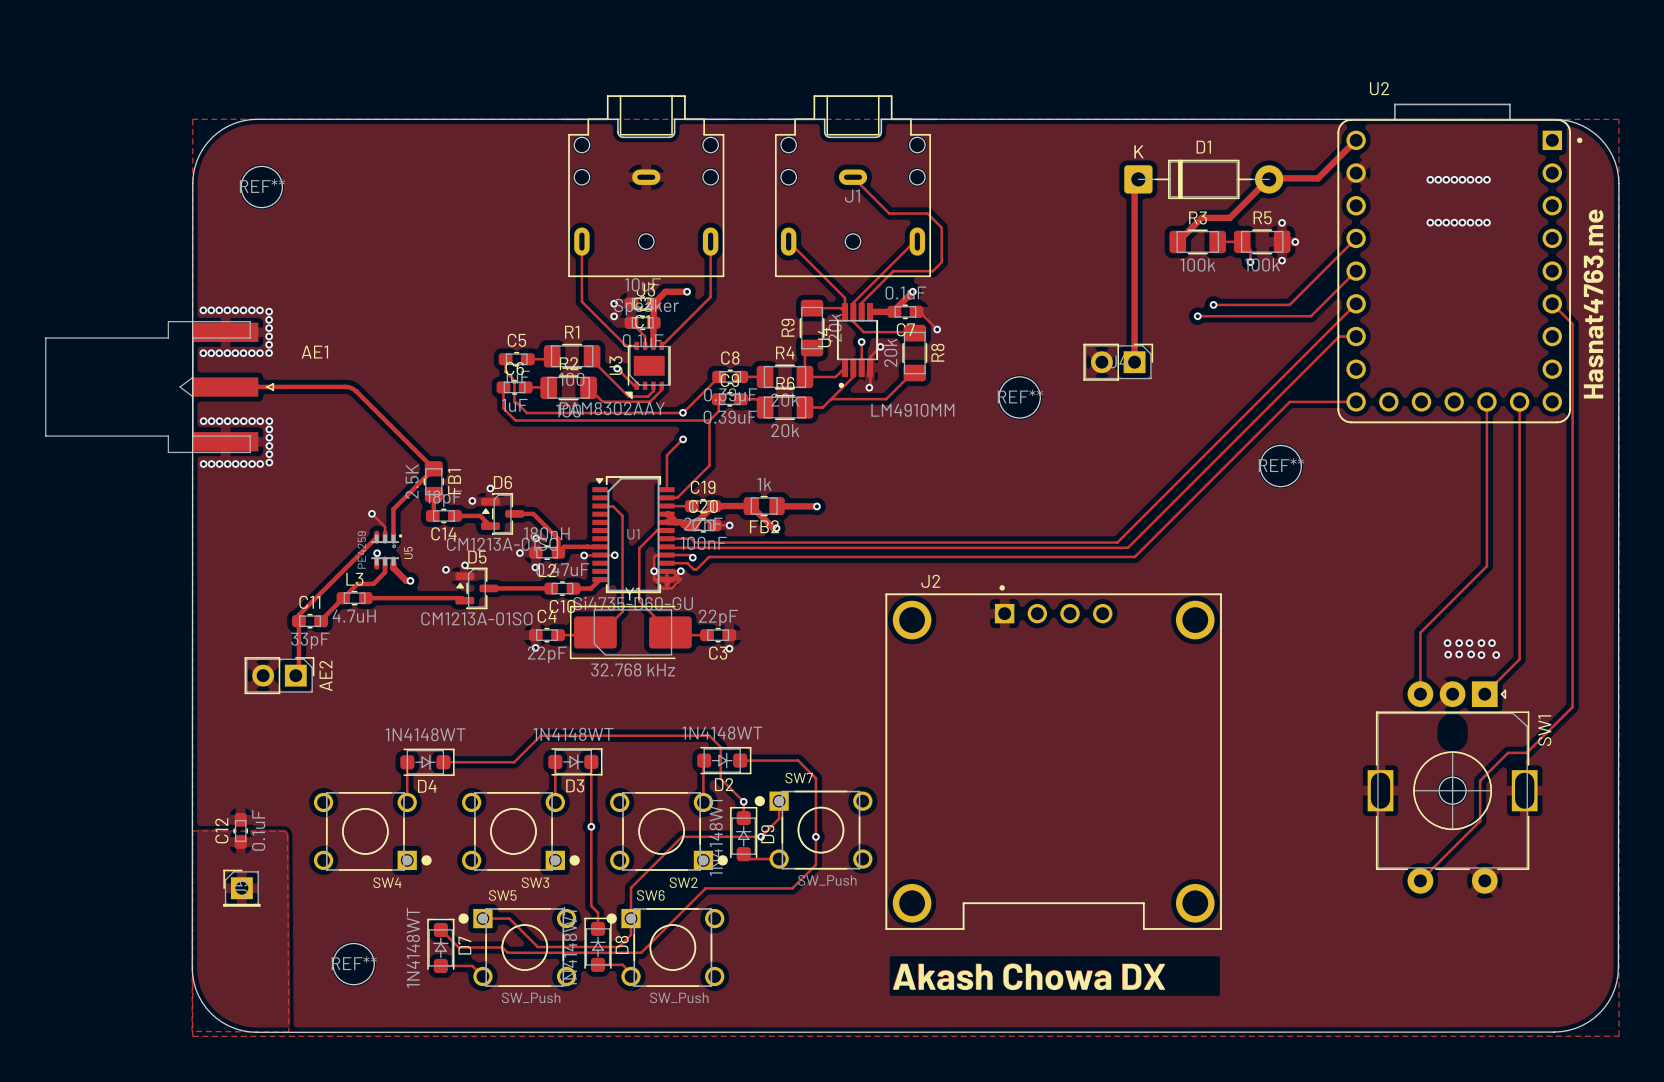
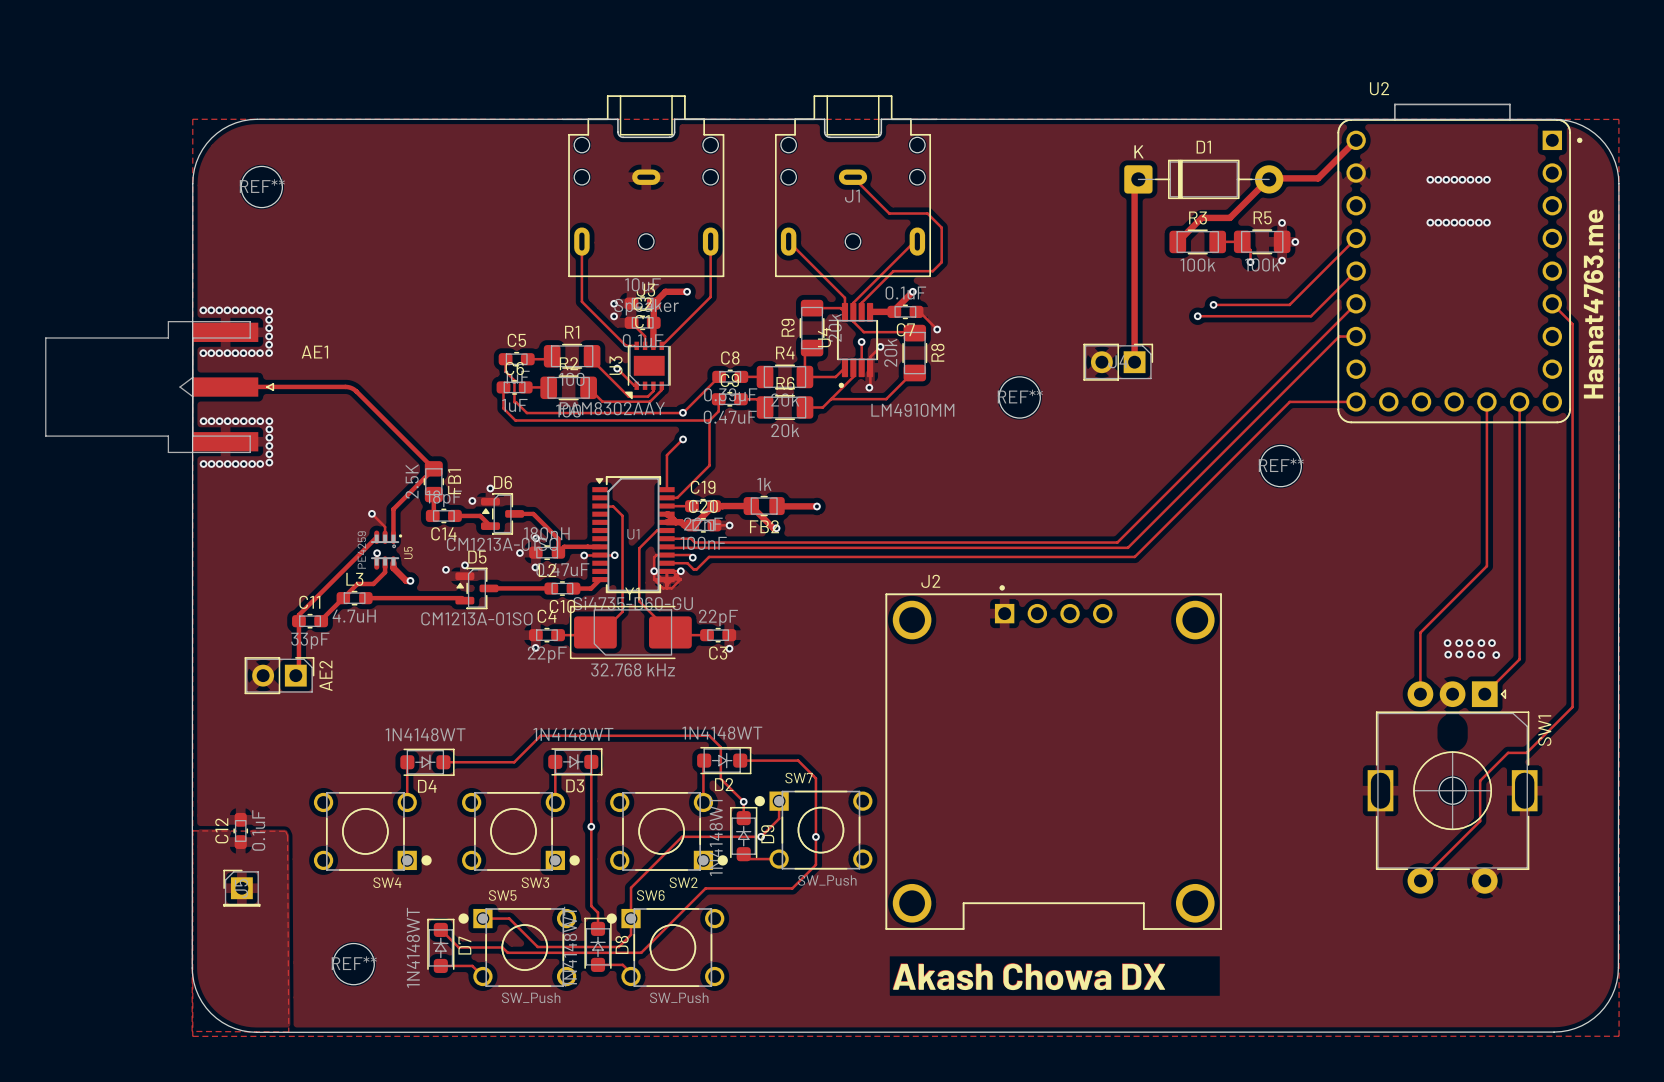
C9 value: 0.39uF (730, 417) -> 0.47uF (730, 417)

